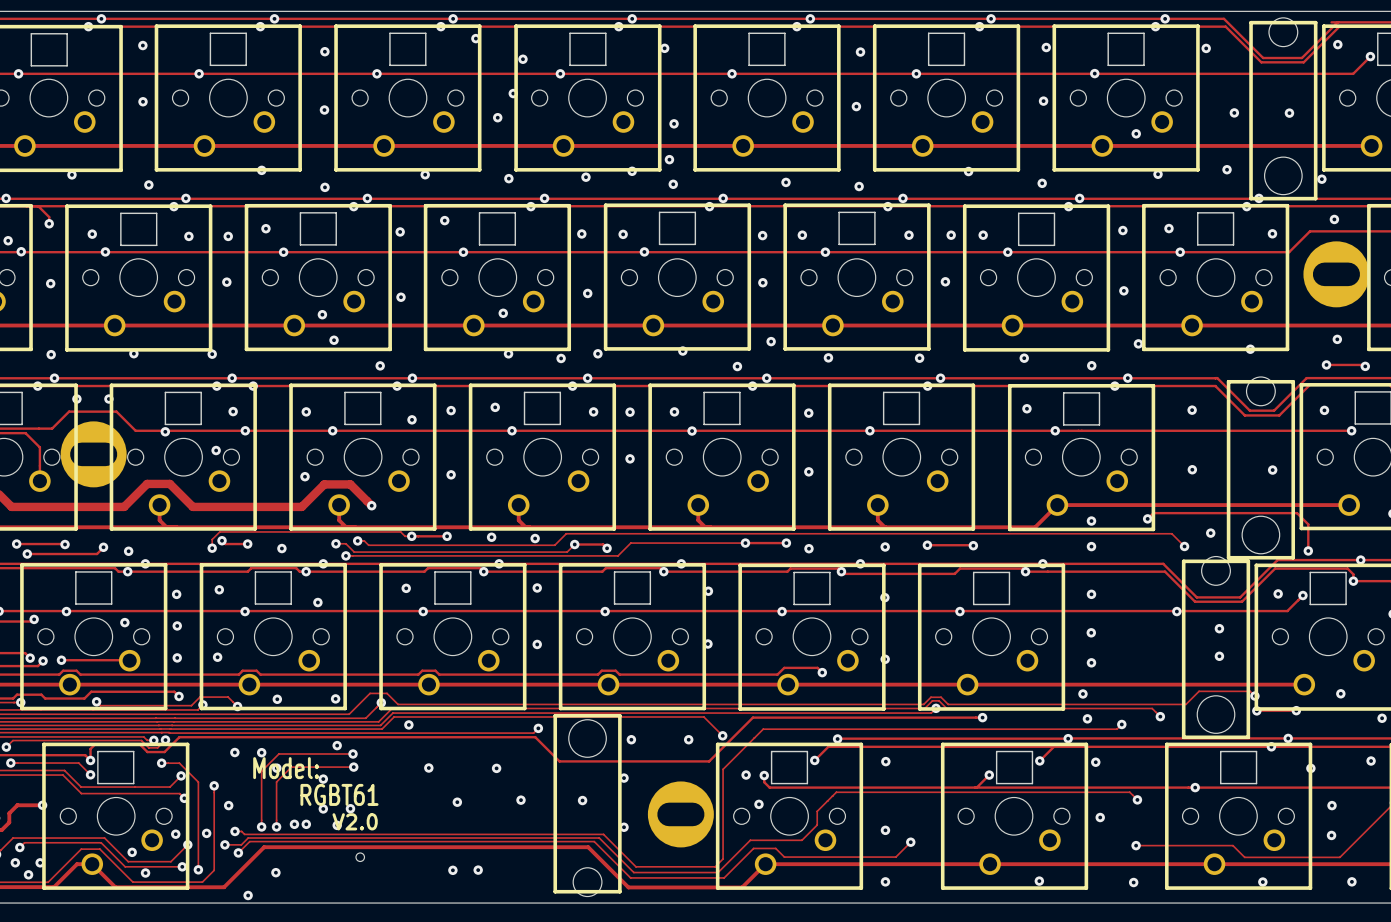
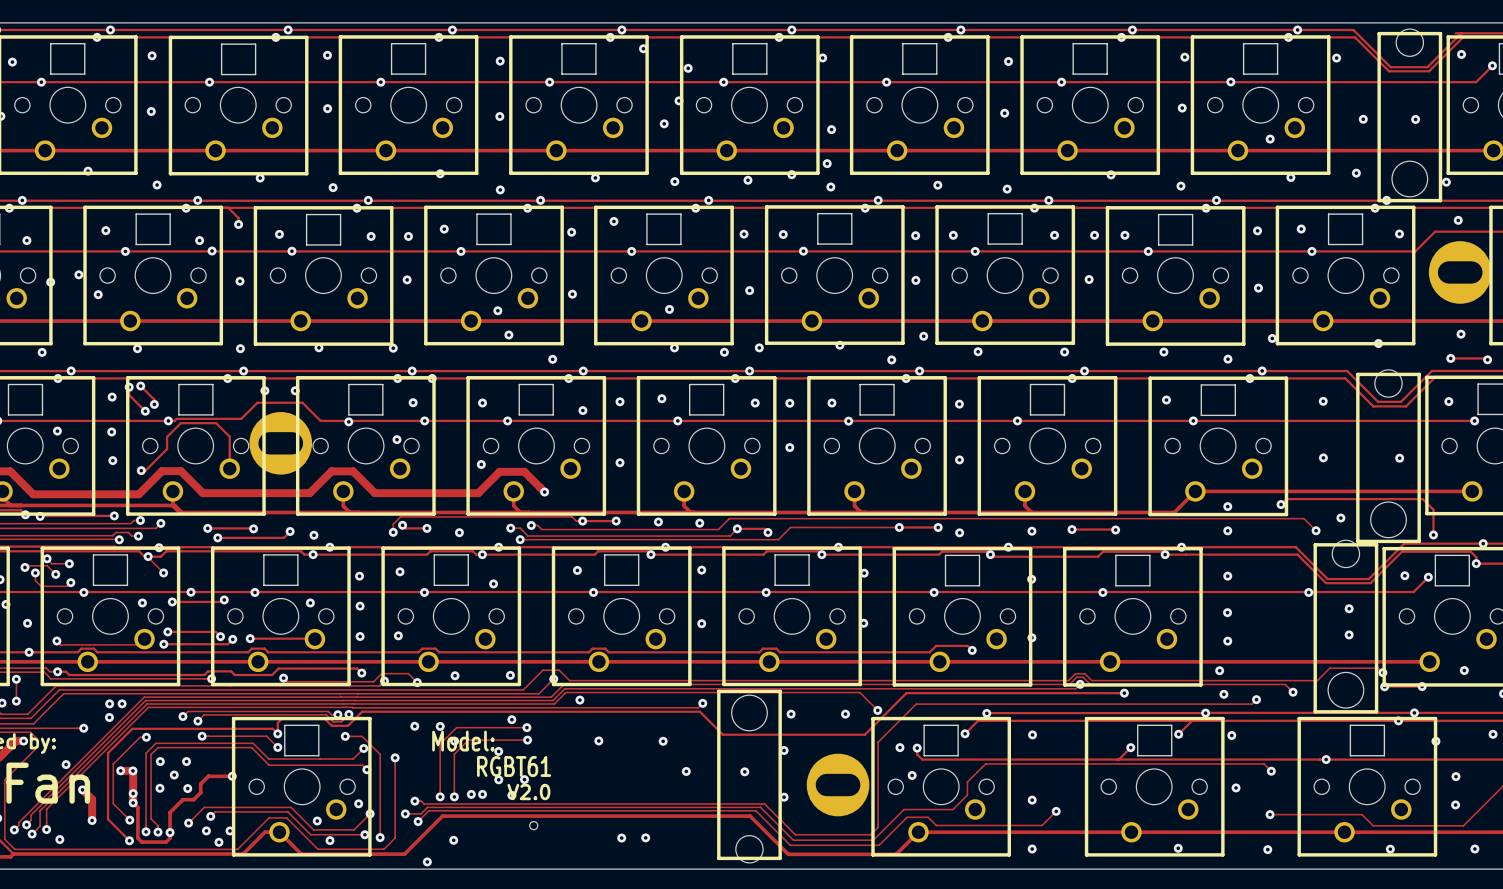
via: (457, 802) -> none
via: (228, 805) -> none
via: (206, 833) -> none

